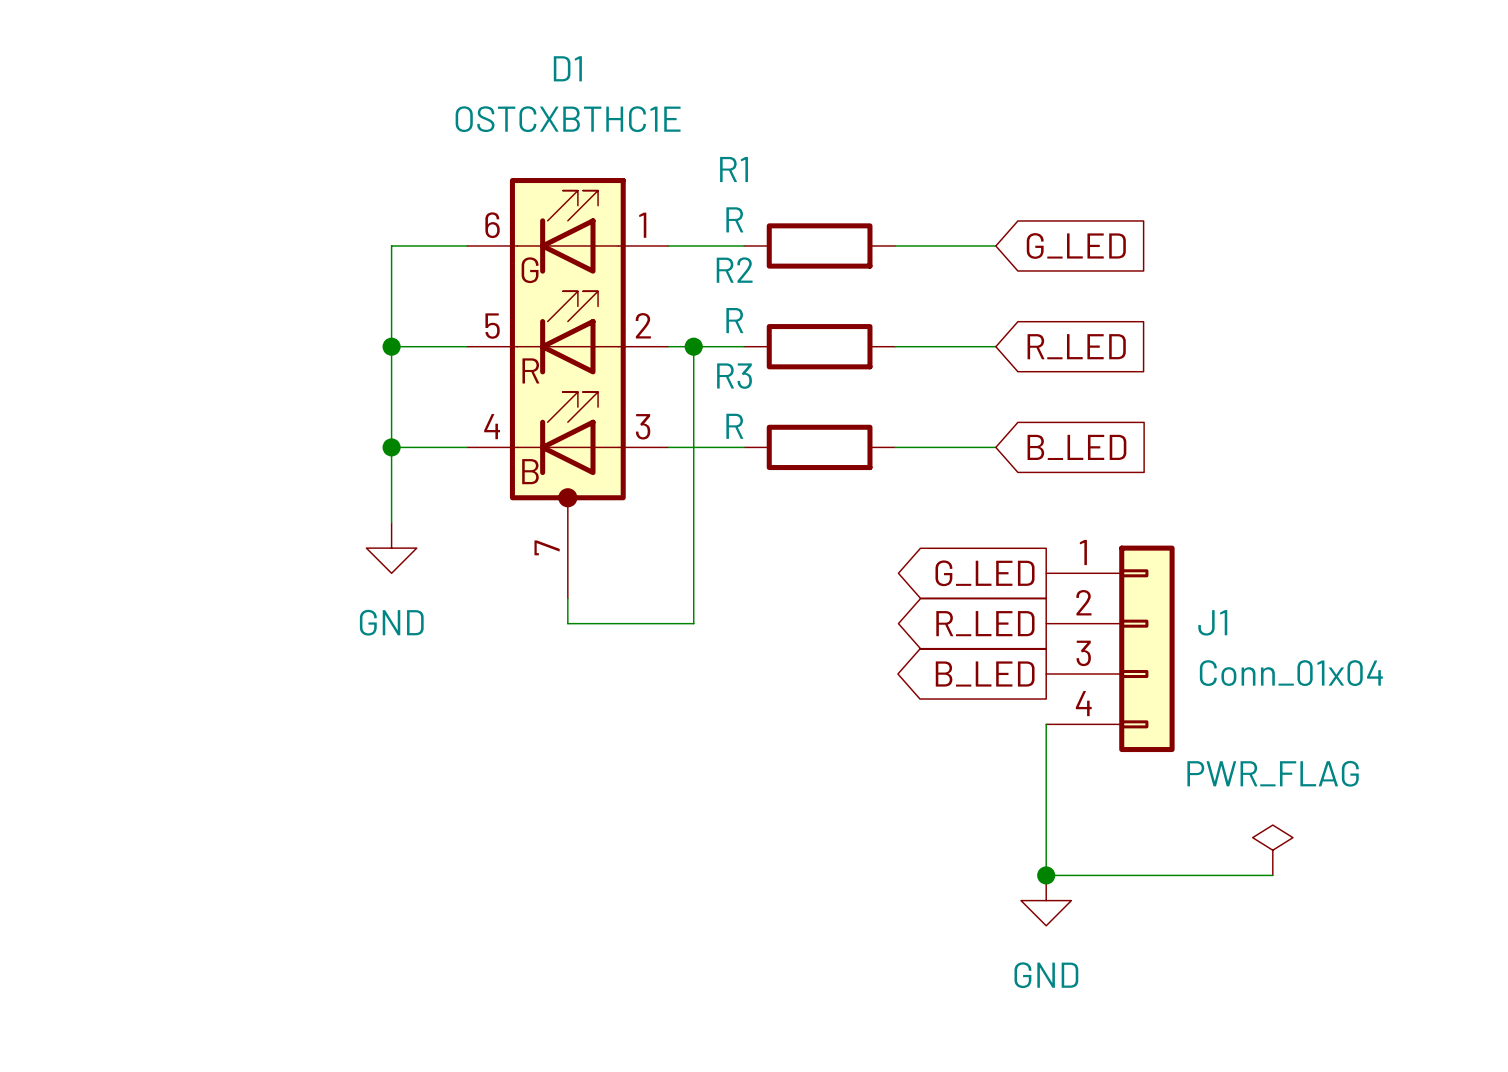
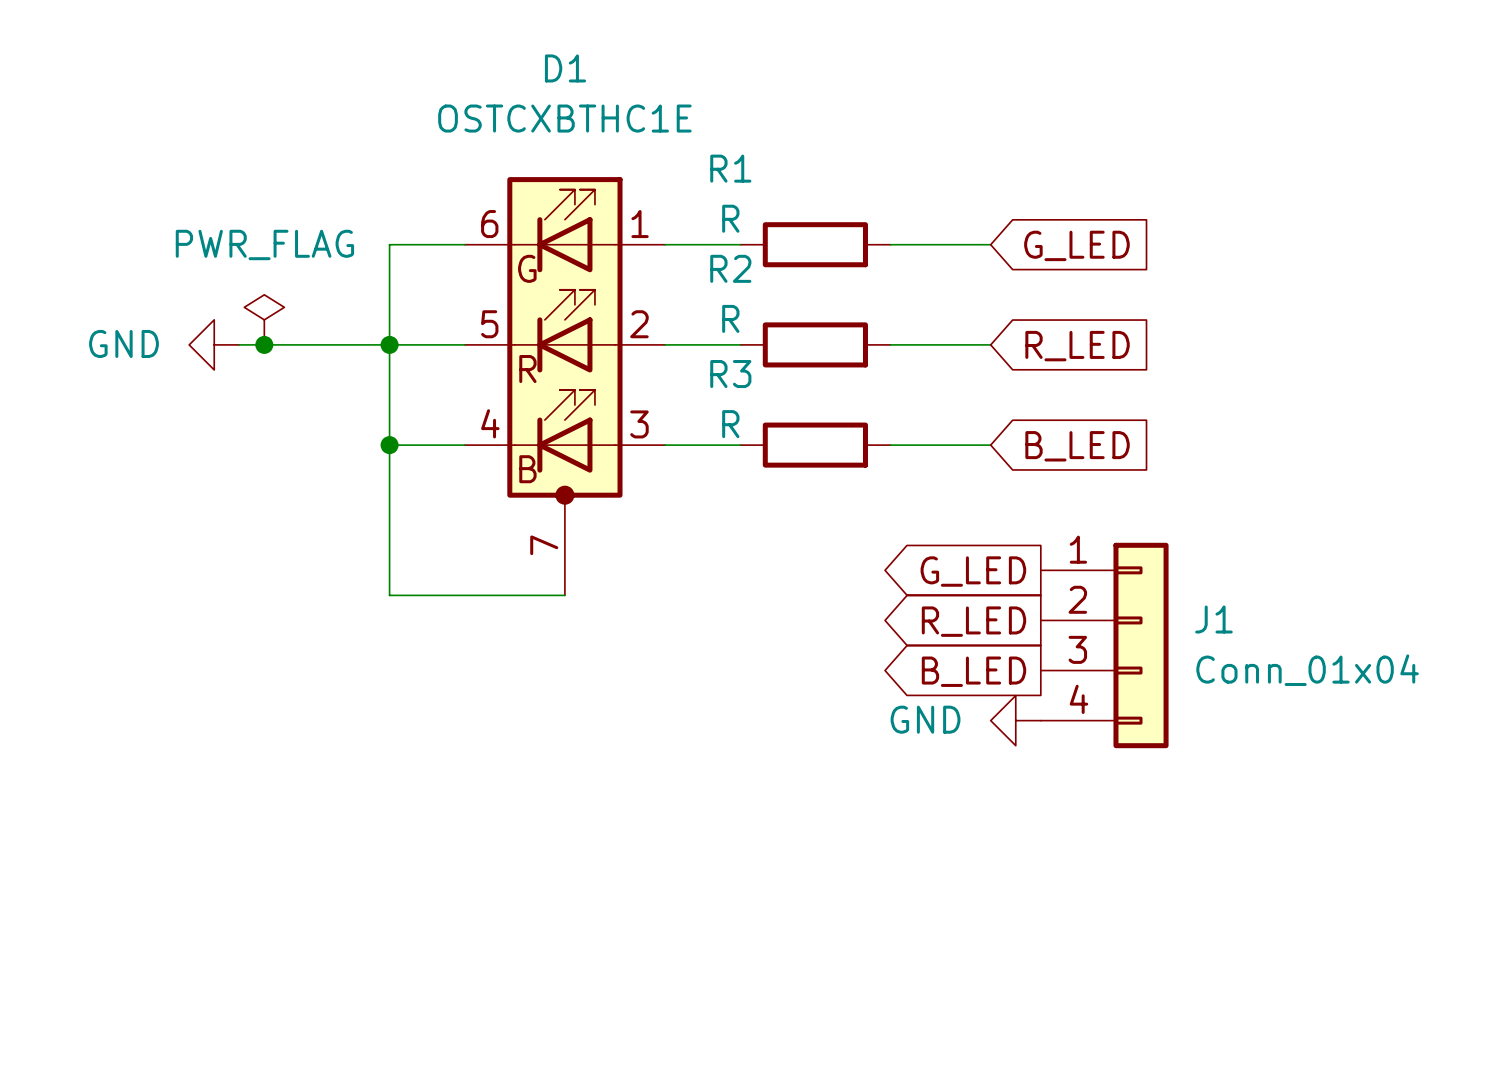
power symbol: none -> PWR_FLAG (264, 319)
wire: none -> (239, 344) (389, 344)
junction: none -> (264, 344)
wire: (693, 346) (693, 623) (567, 623) (567, 598) -> (389, 520) (389, 595) (564, 595)
junction: (693, 346) -> none
power symbol rotation: 0° (391, 548) -> 90° clockwise (214, 344)
power symbol position: GND (391, 548) -> GND (214, 344)
wire: (1046, 724) (1046, 875) (1272, 875) -> none
power symbol: PWR_FLAG (1272, 850) -> none
junction: (1046, 875) -> none
power symbol rotation: 0° (1046, 900) -> 90° clockwise (1015, 720)
power symbol position: GND (1046, 900) -> GND (1015, 720)

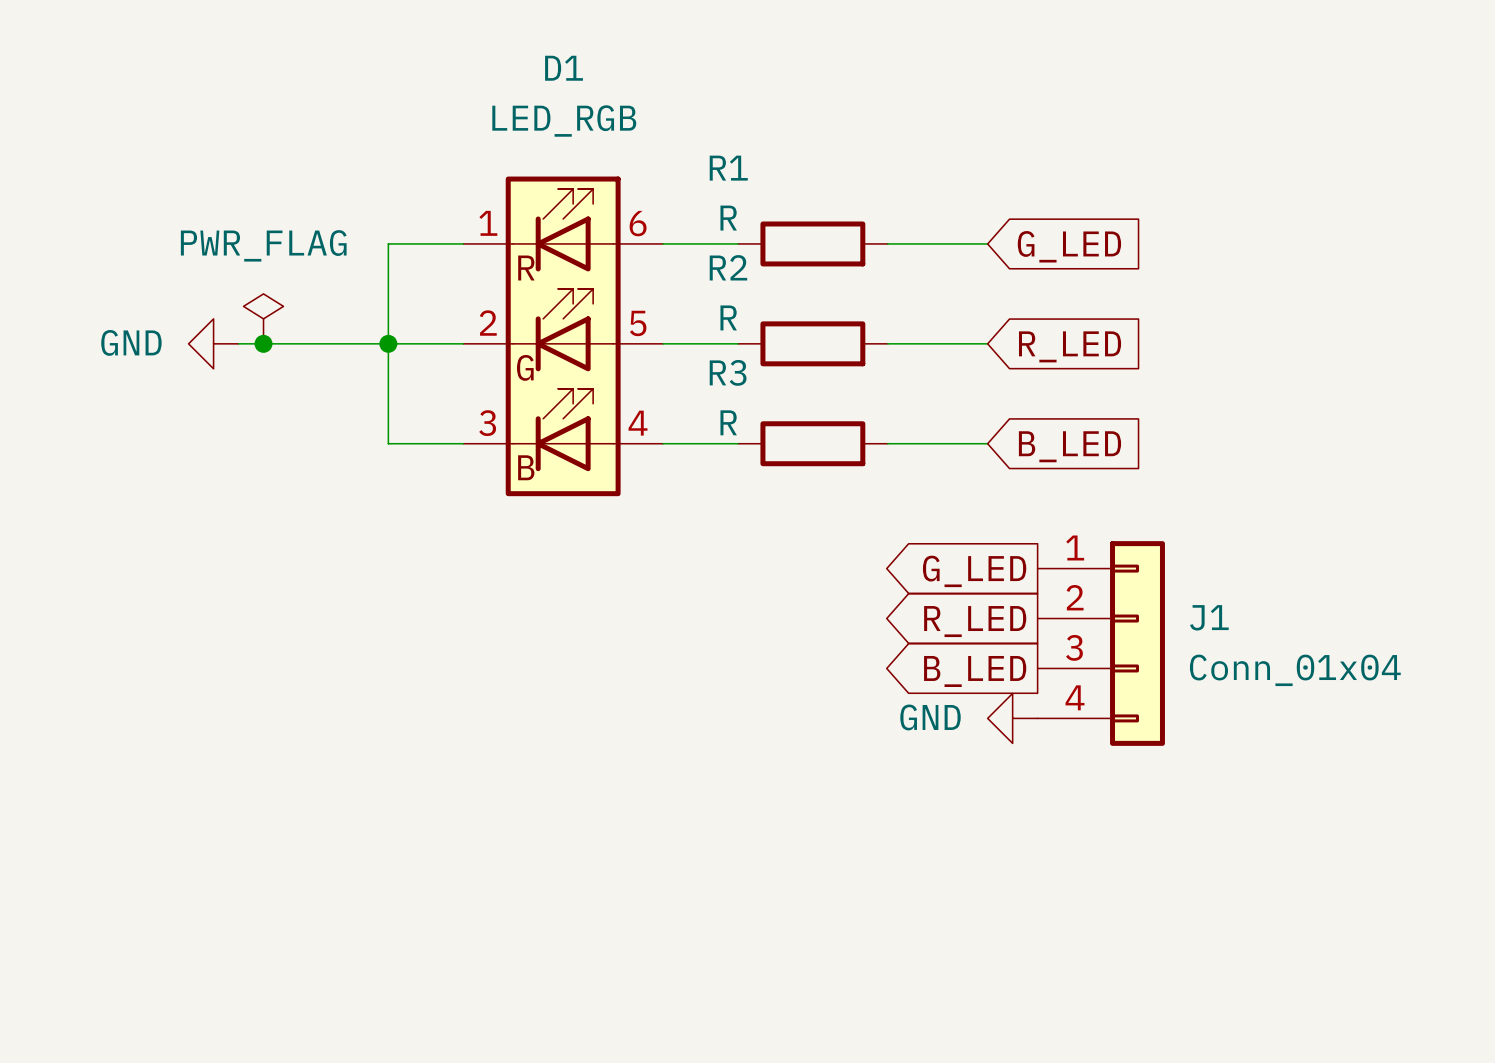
D1 value: OSTCXBTHC1E (564, 118) -> LED_RGB (564, 120)
D1 symbol: [464, 177, 666, 596] -> [463, 176, 664, 497]
wire: (389, 445) (389, 595) (564, 595) -> none
junction: (389, 445) -> none

